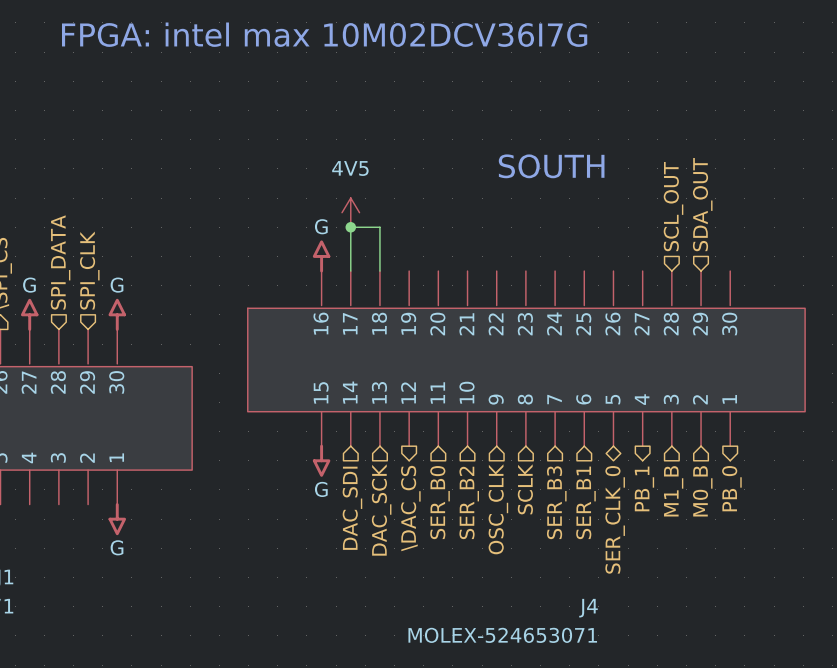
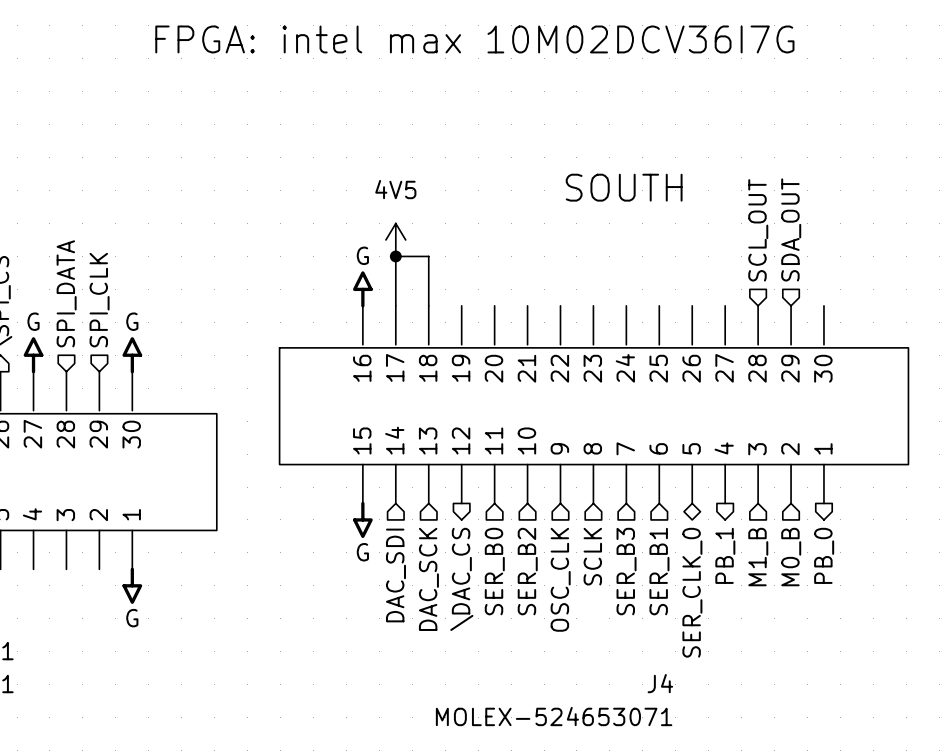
text position: FPGA: intel max 10M02DCV36I7G (324, 34) -> FPGA: intel max 10M02DCV36I7G (474, 39)

